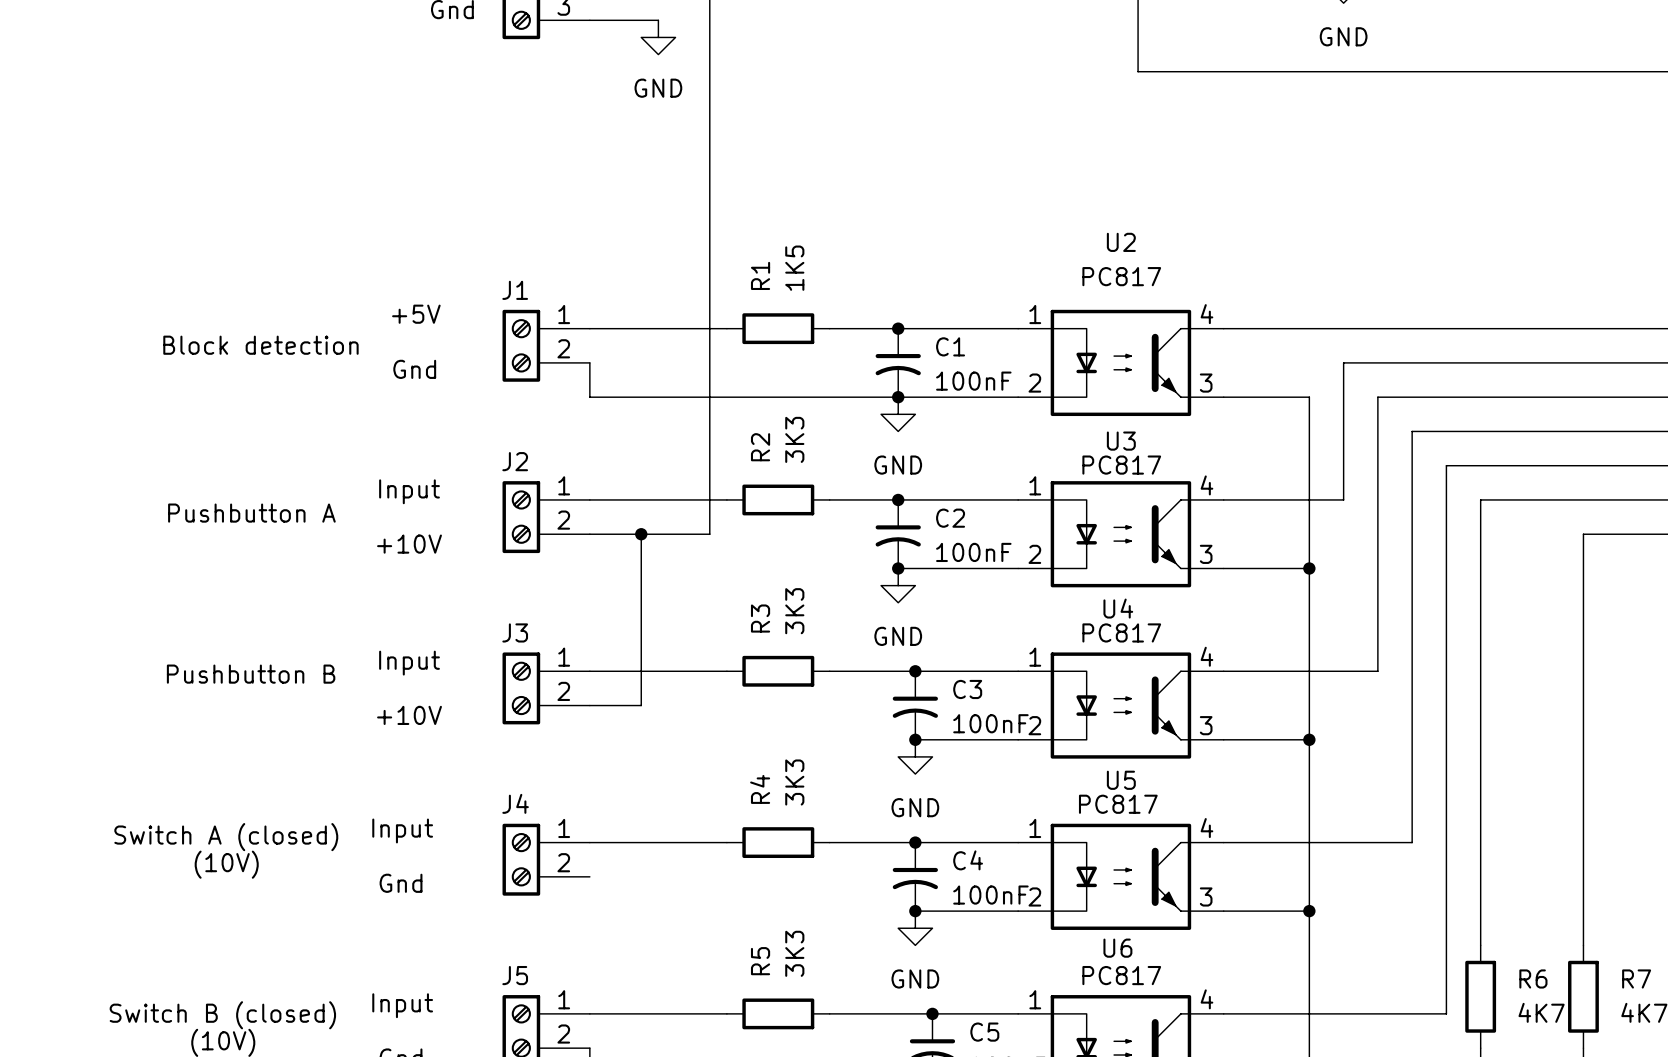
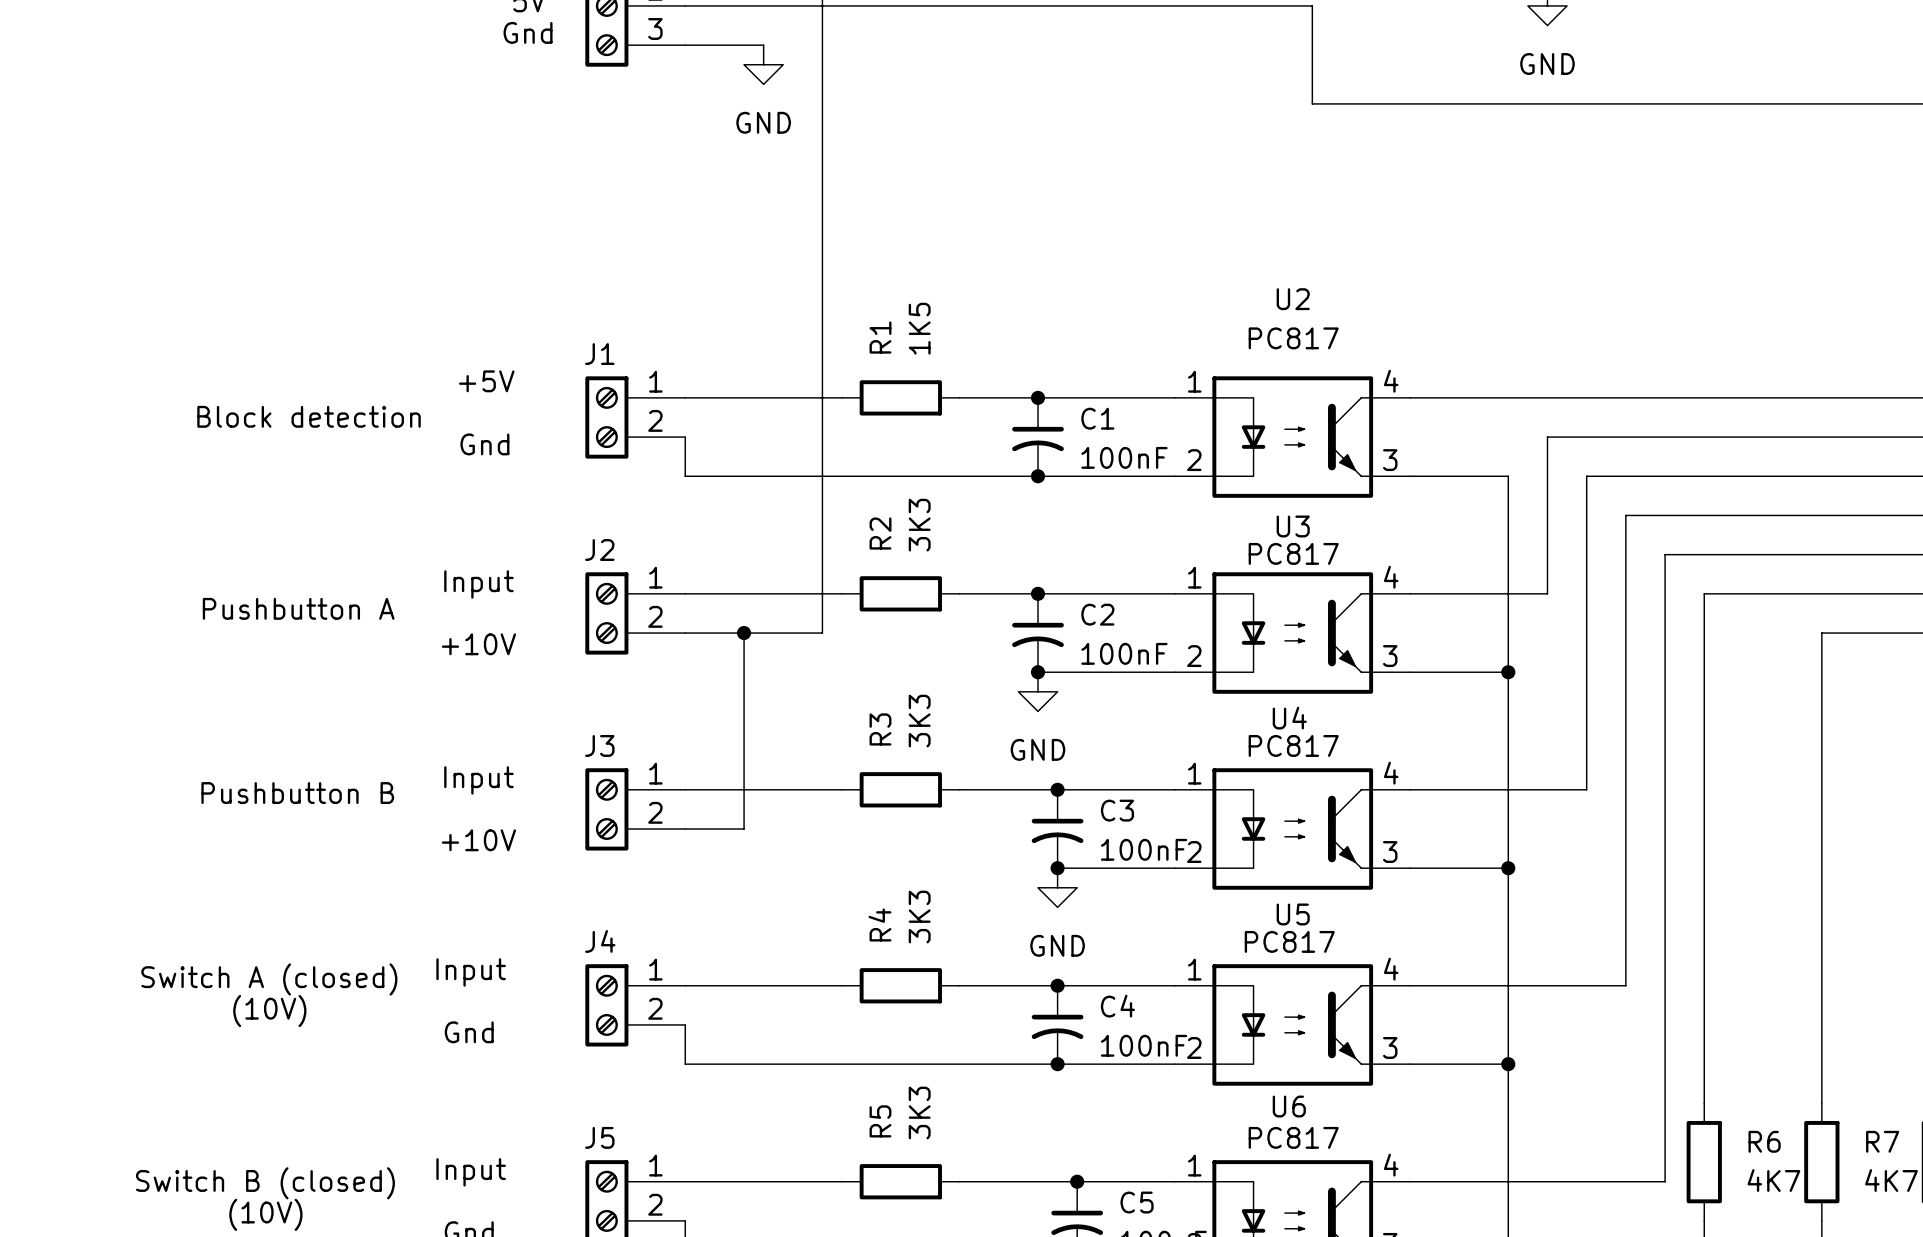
power symbol: GND (898, 414) -> none
wire: none -> (685, 1024) (685, 1064) (1057, 1064)
power symbol: GND (915, 928) -> none

